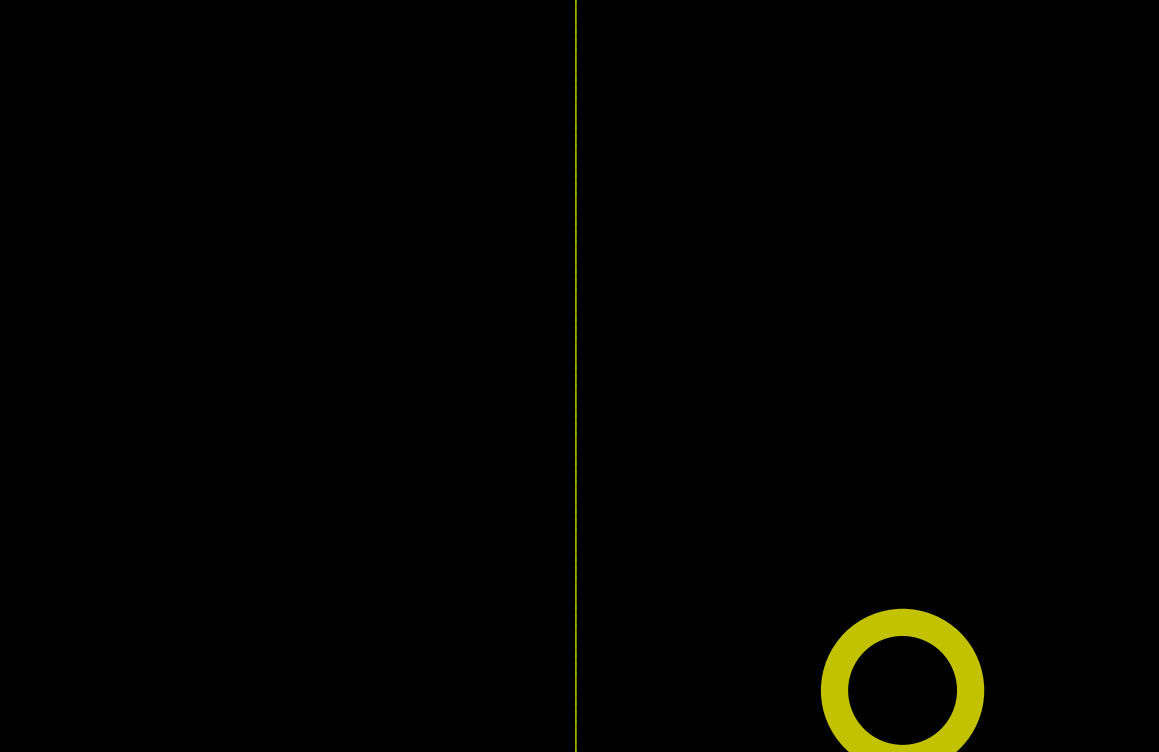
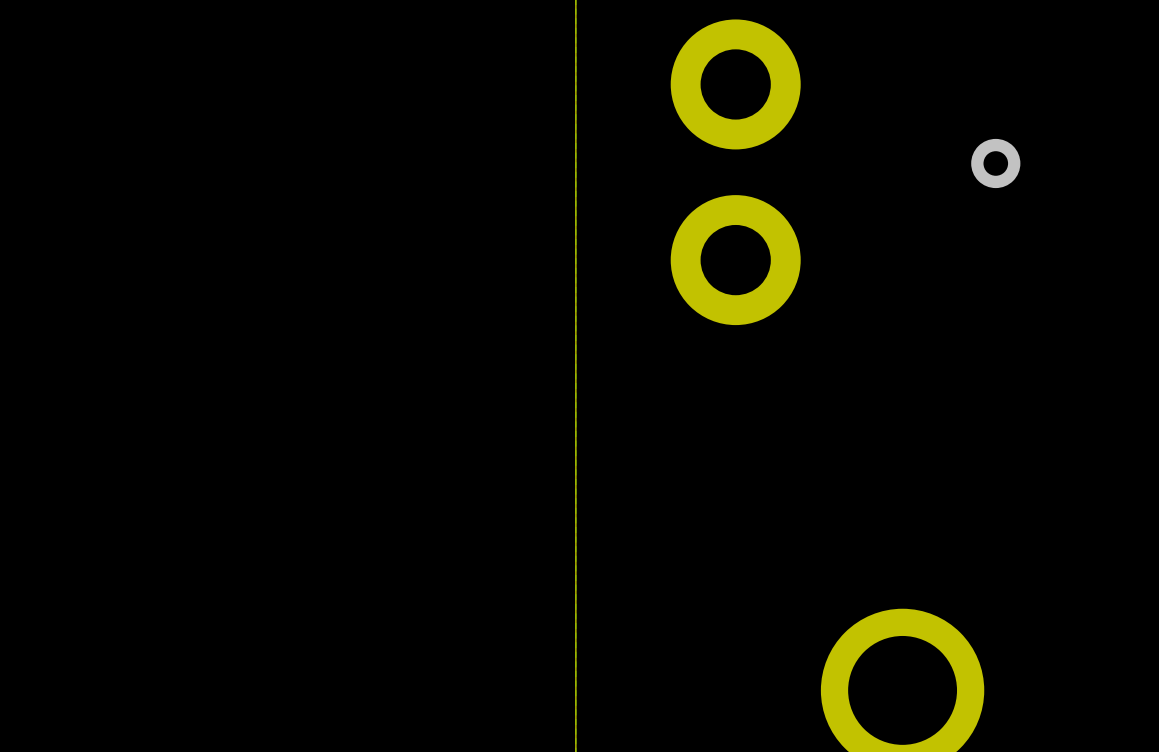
via: none -> (995, 163)
part: none -> (735, 172)

